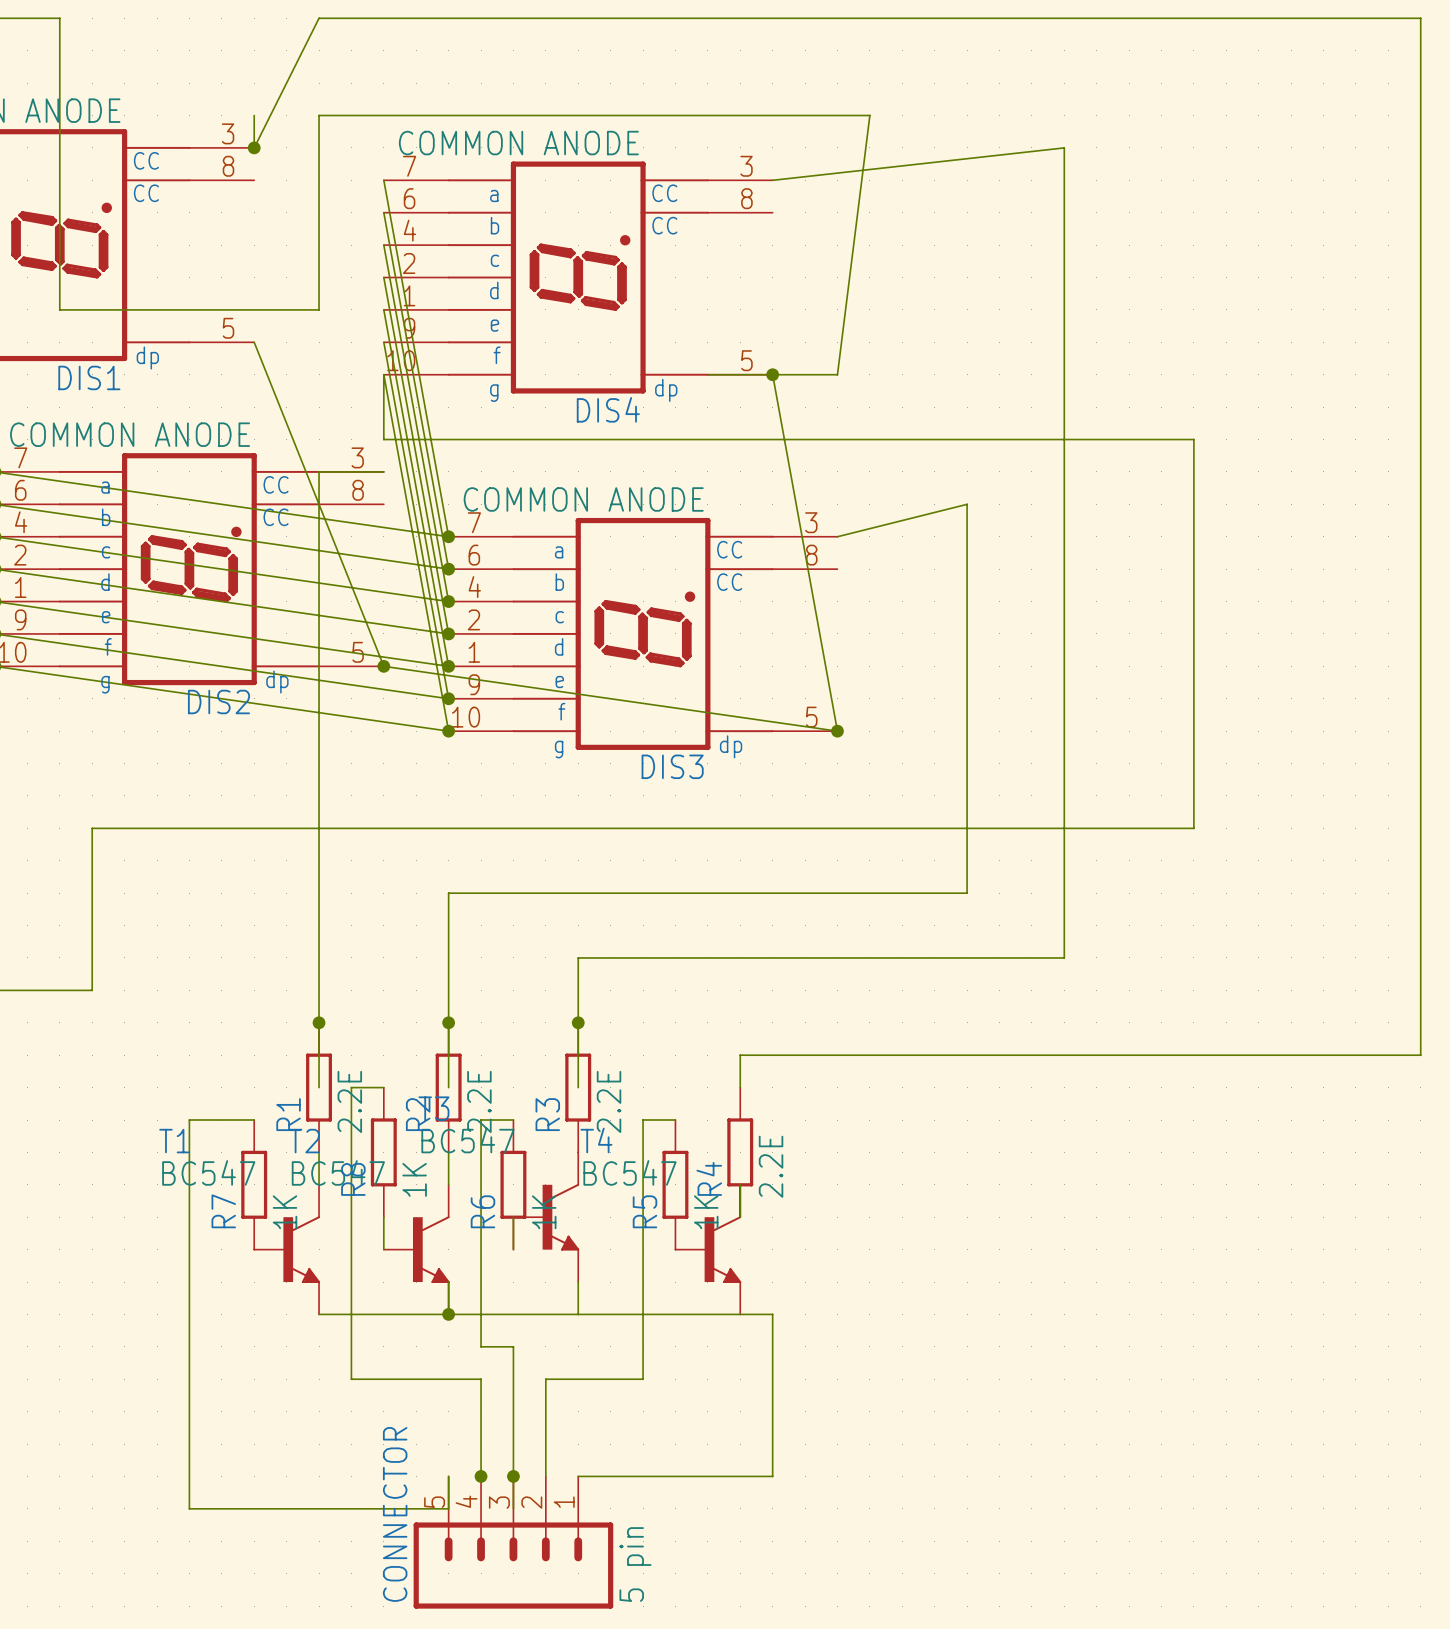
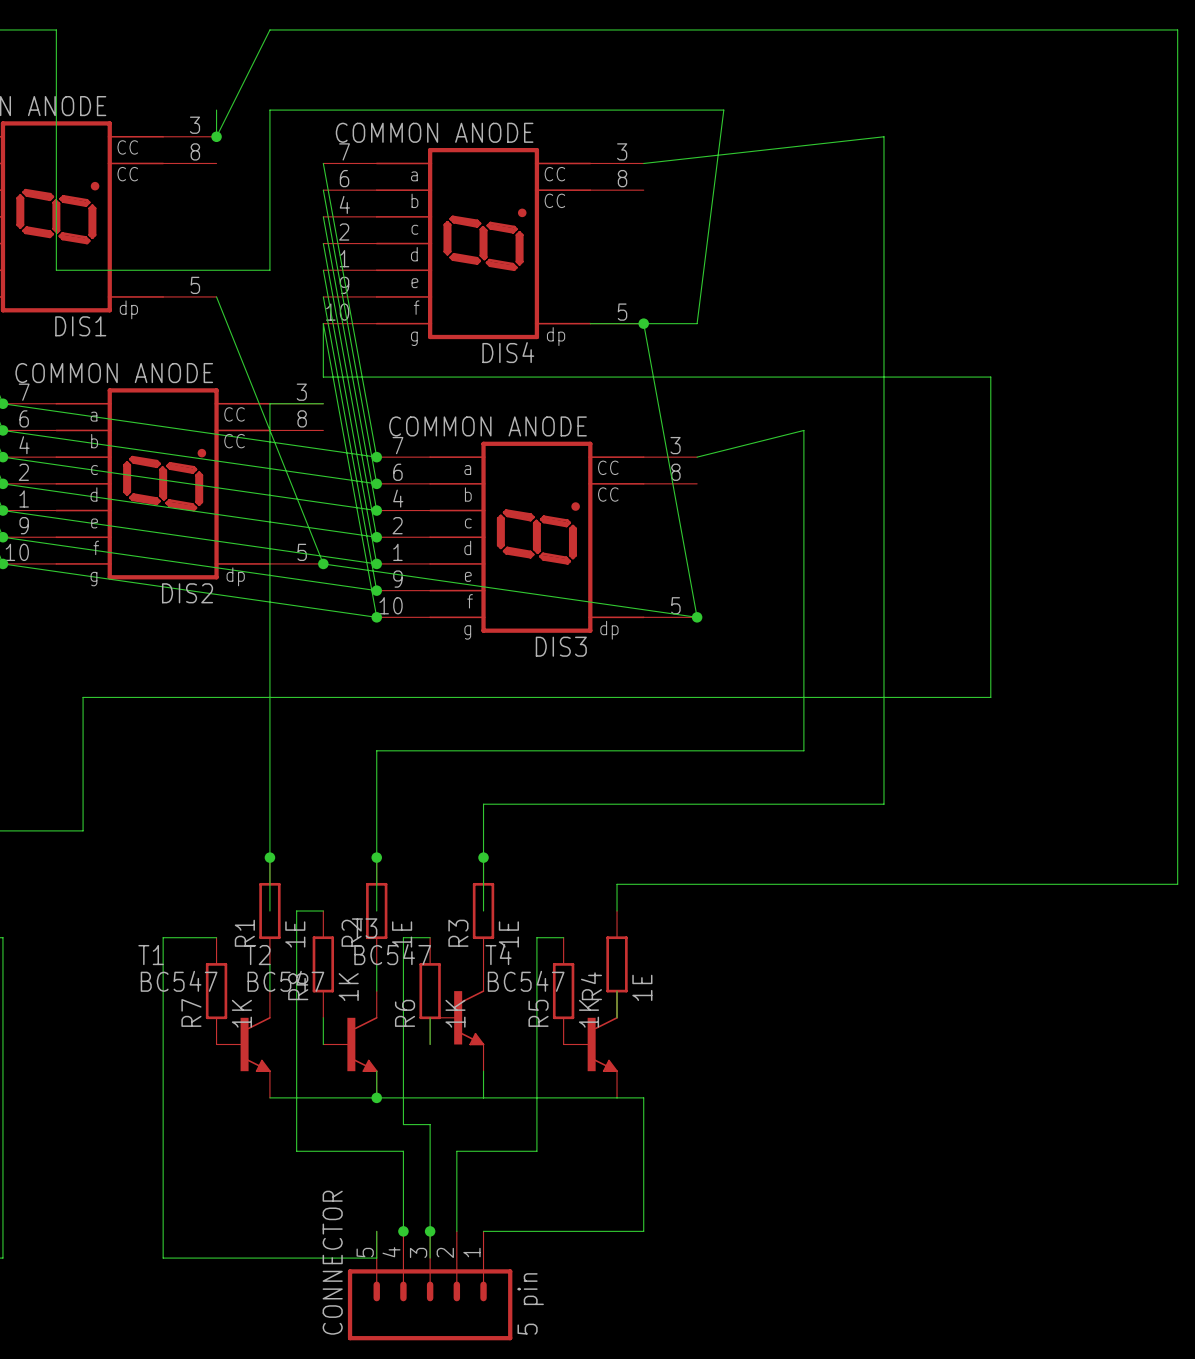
R1 value: 2.2E (349, 1101) -> 1E (295, 934)
R2 value: 2.2E (479, 1101) -> 1E (402, 934)
R3 value: 2.2E (609, 1101) -> 1E (508, 934)
R4 value: 2.2E (771, 1166) -> 1E (642, 987)

